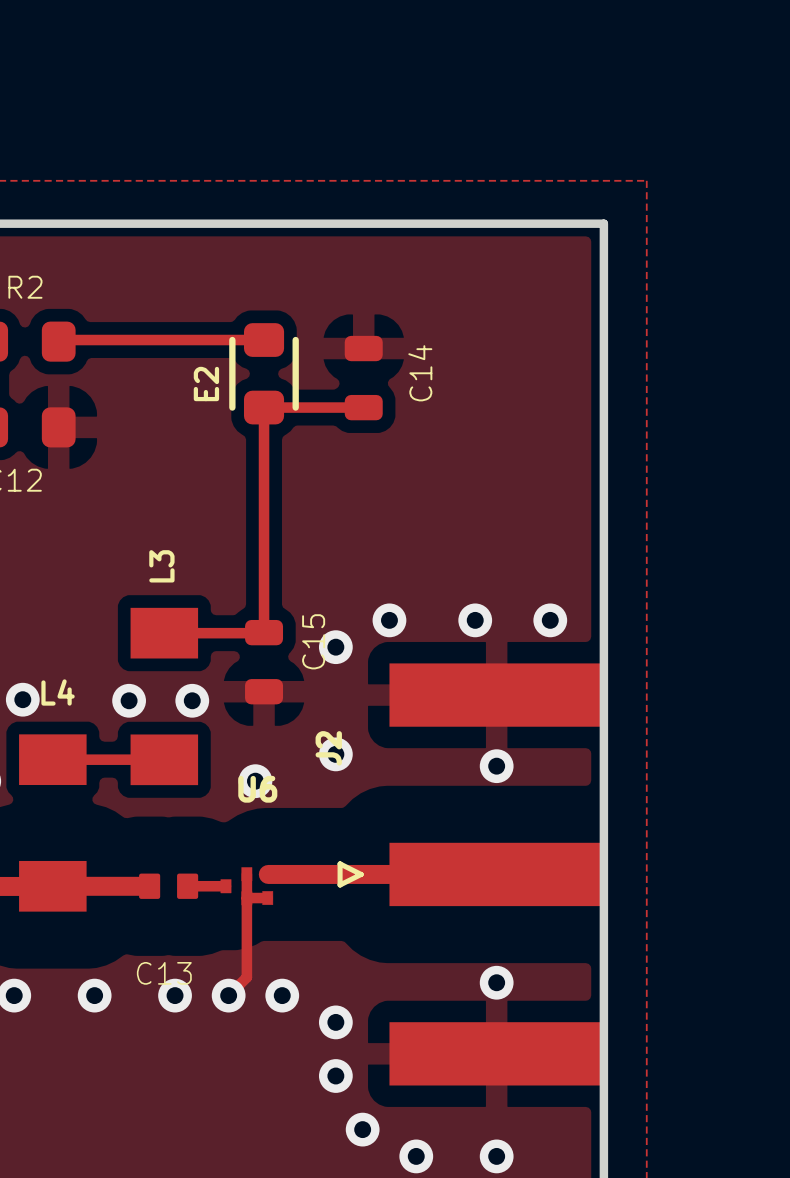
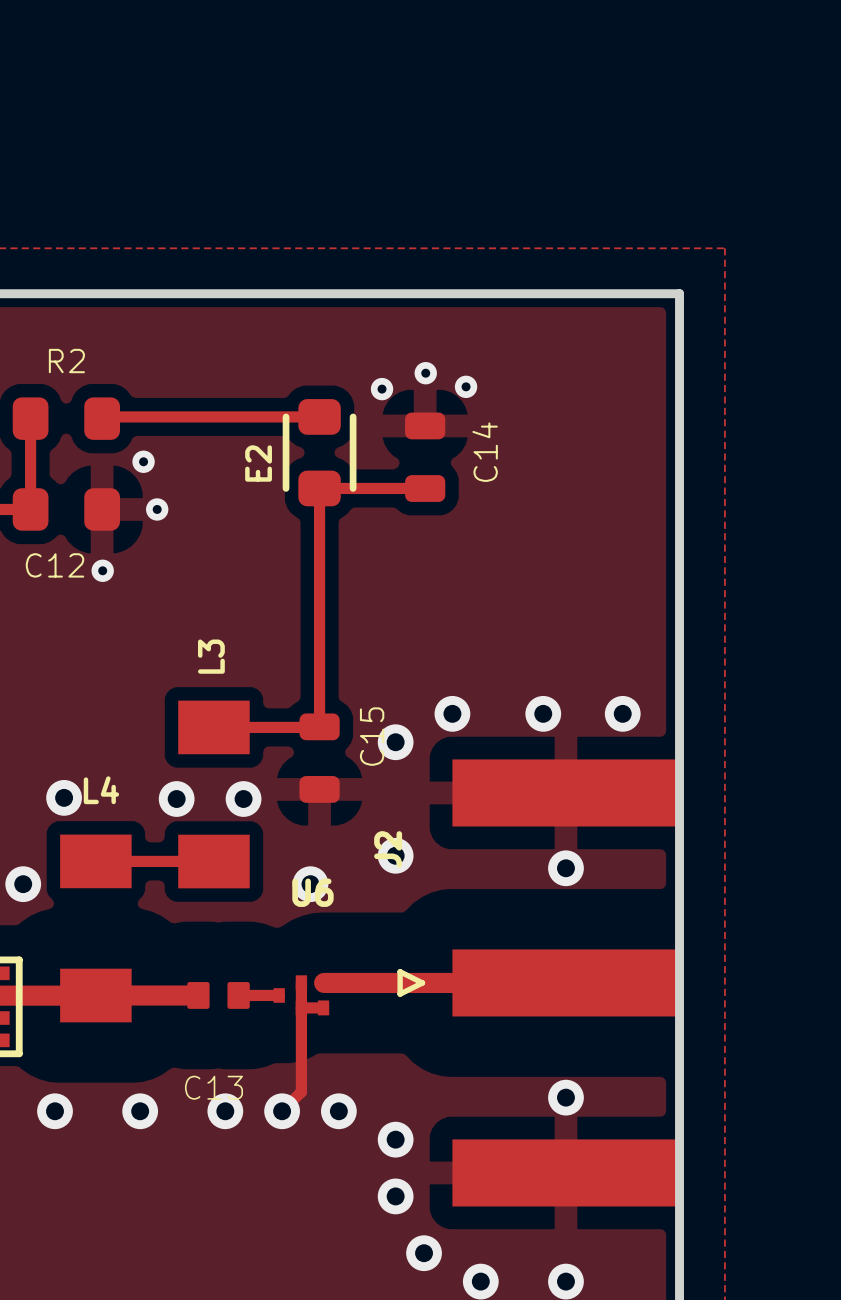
via: none -> (425, 373)
via: none -> (466, 386)
via: none -> (382, 389)
via: none -> (143, 461)
via: none -> (157, 509)
via: none -> (102, 570)

